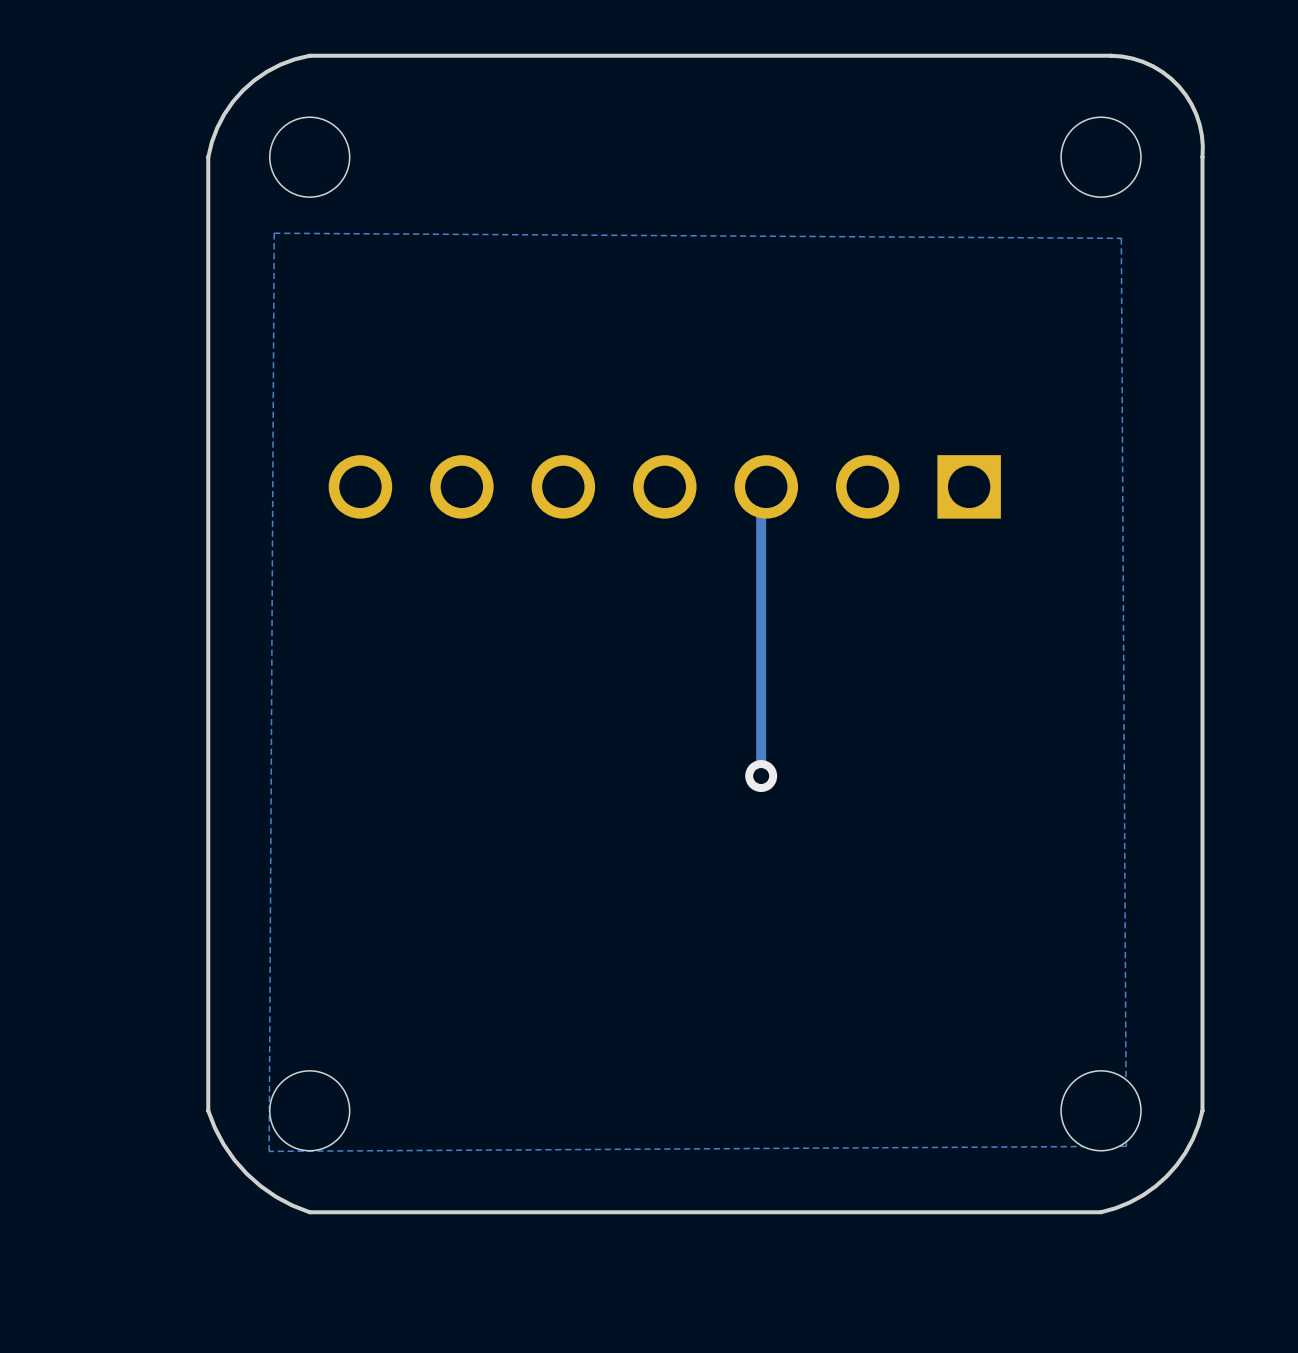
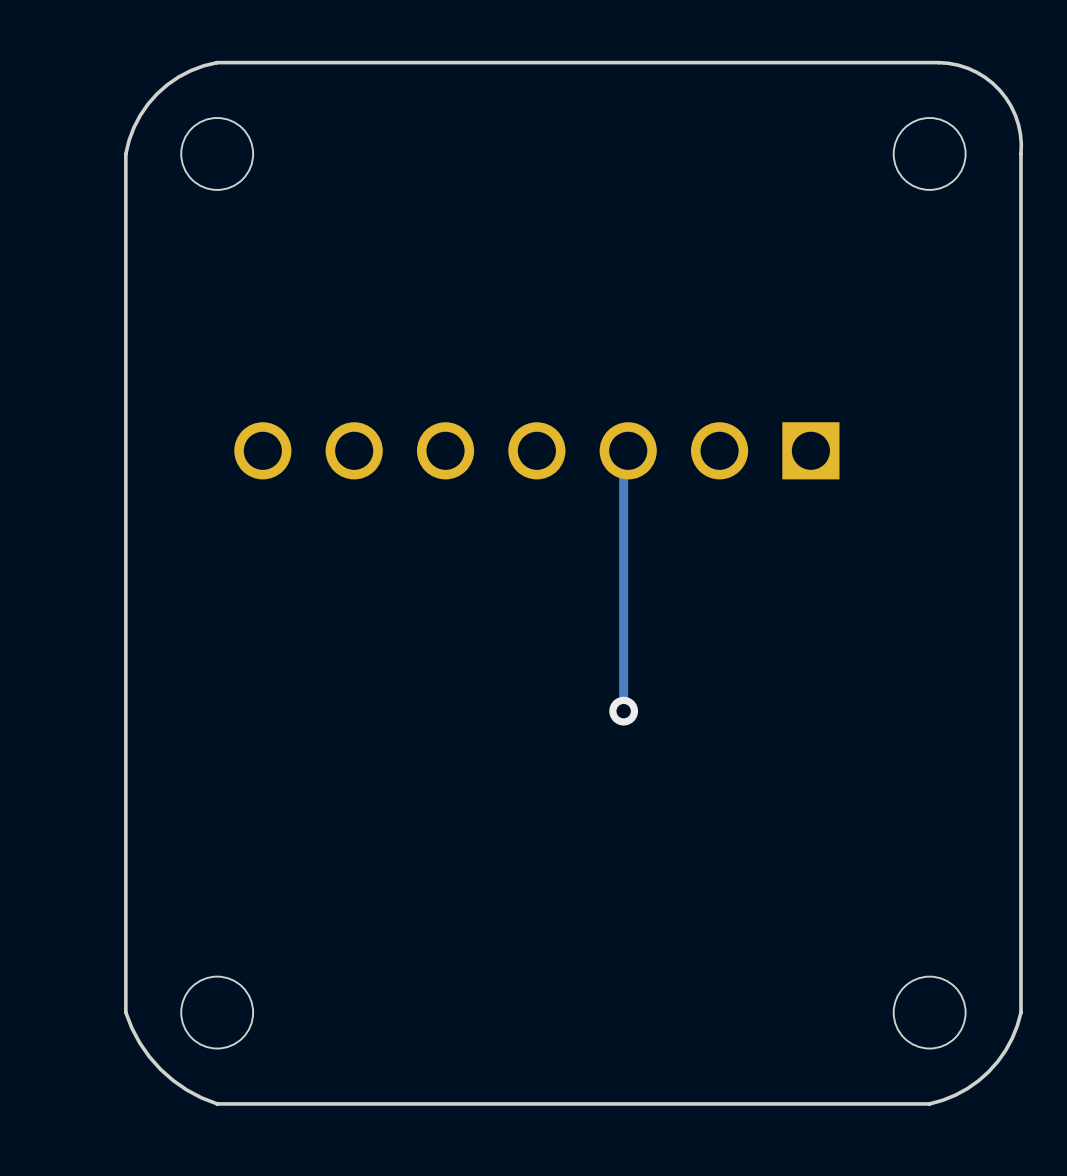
zone outline: (274, 233) (269, 1151) (1126, 1146) (1121, 238) (274, 233) -> none

